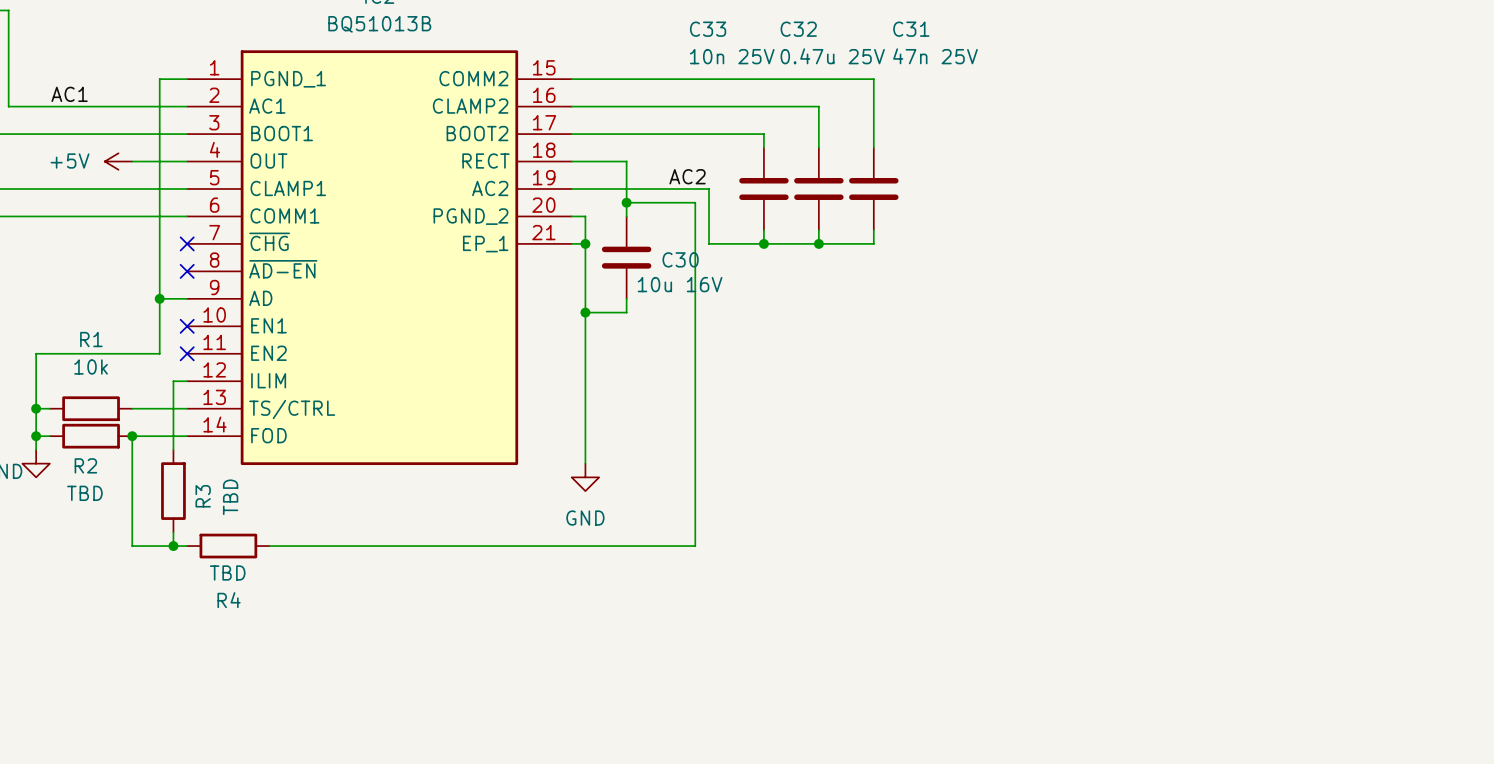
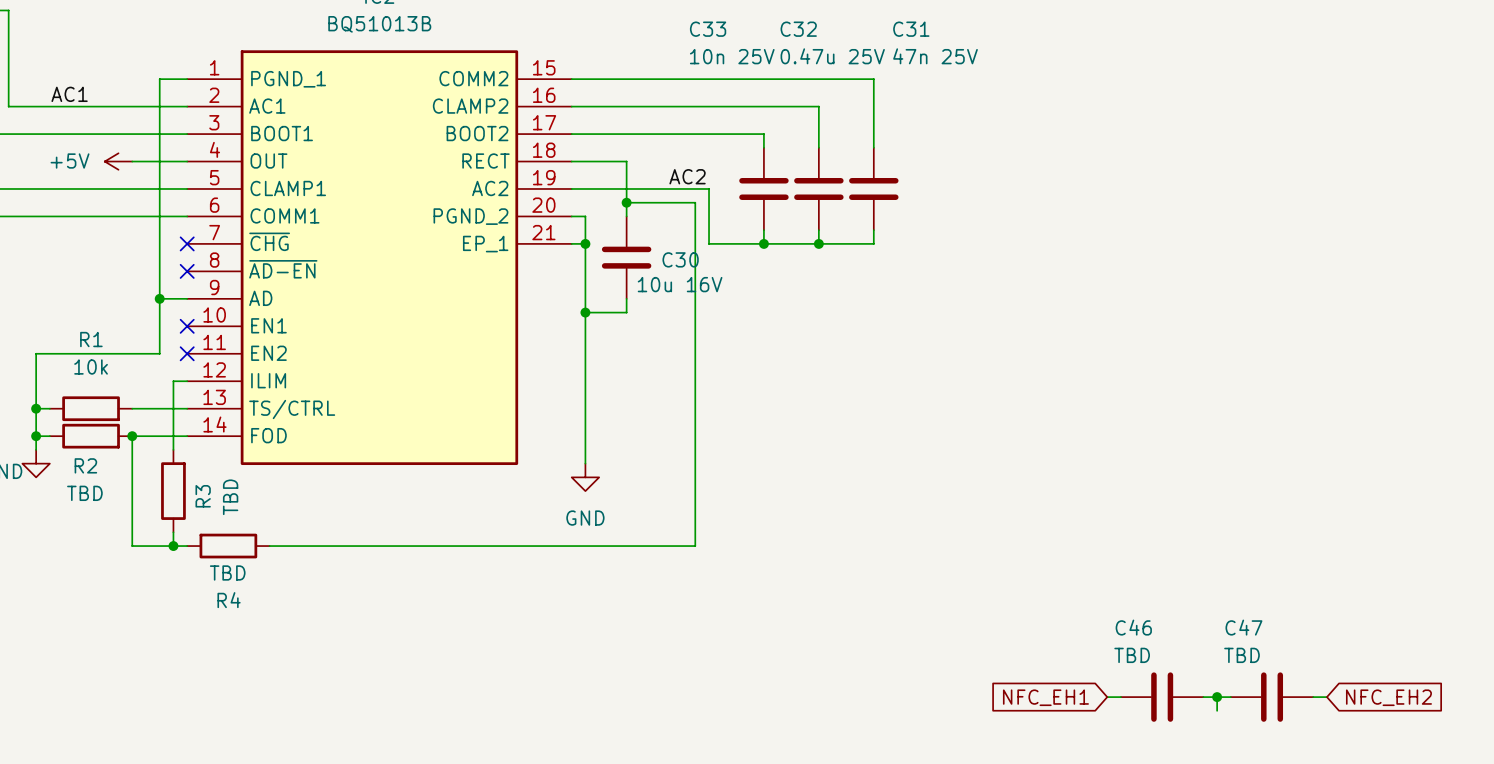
global label: none -> NFC_EH1 (1045, 697)
wire: none -> (1107, 697) (1120, 697)
C46: none -> TBD (1162, 697)
wire: none -> (1203, 697) (1230, 697)
wire: none -> (1217, 697) (1217, 710)
junction: none -> (1217, 697)
C47: none -> TBD (1272, 697)
wire: none -> (1313, 697) (1326, 697)
global label: none -> NFC_EH2 (1388, 697)

